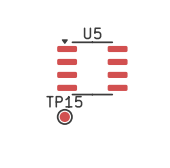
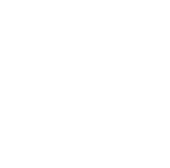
U5: (92, 67) -> none
TP15: (64, 116) -> none

